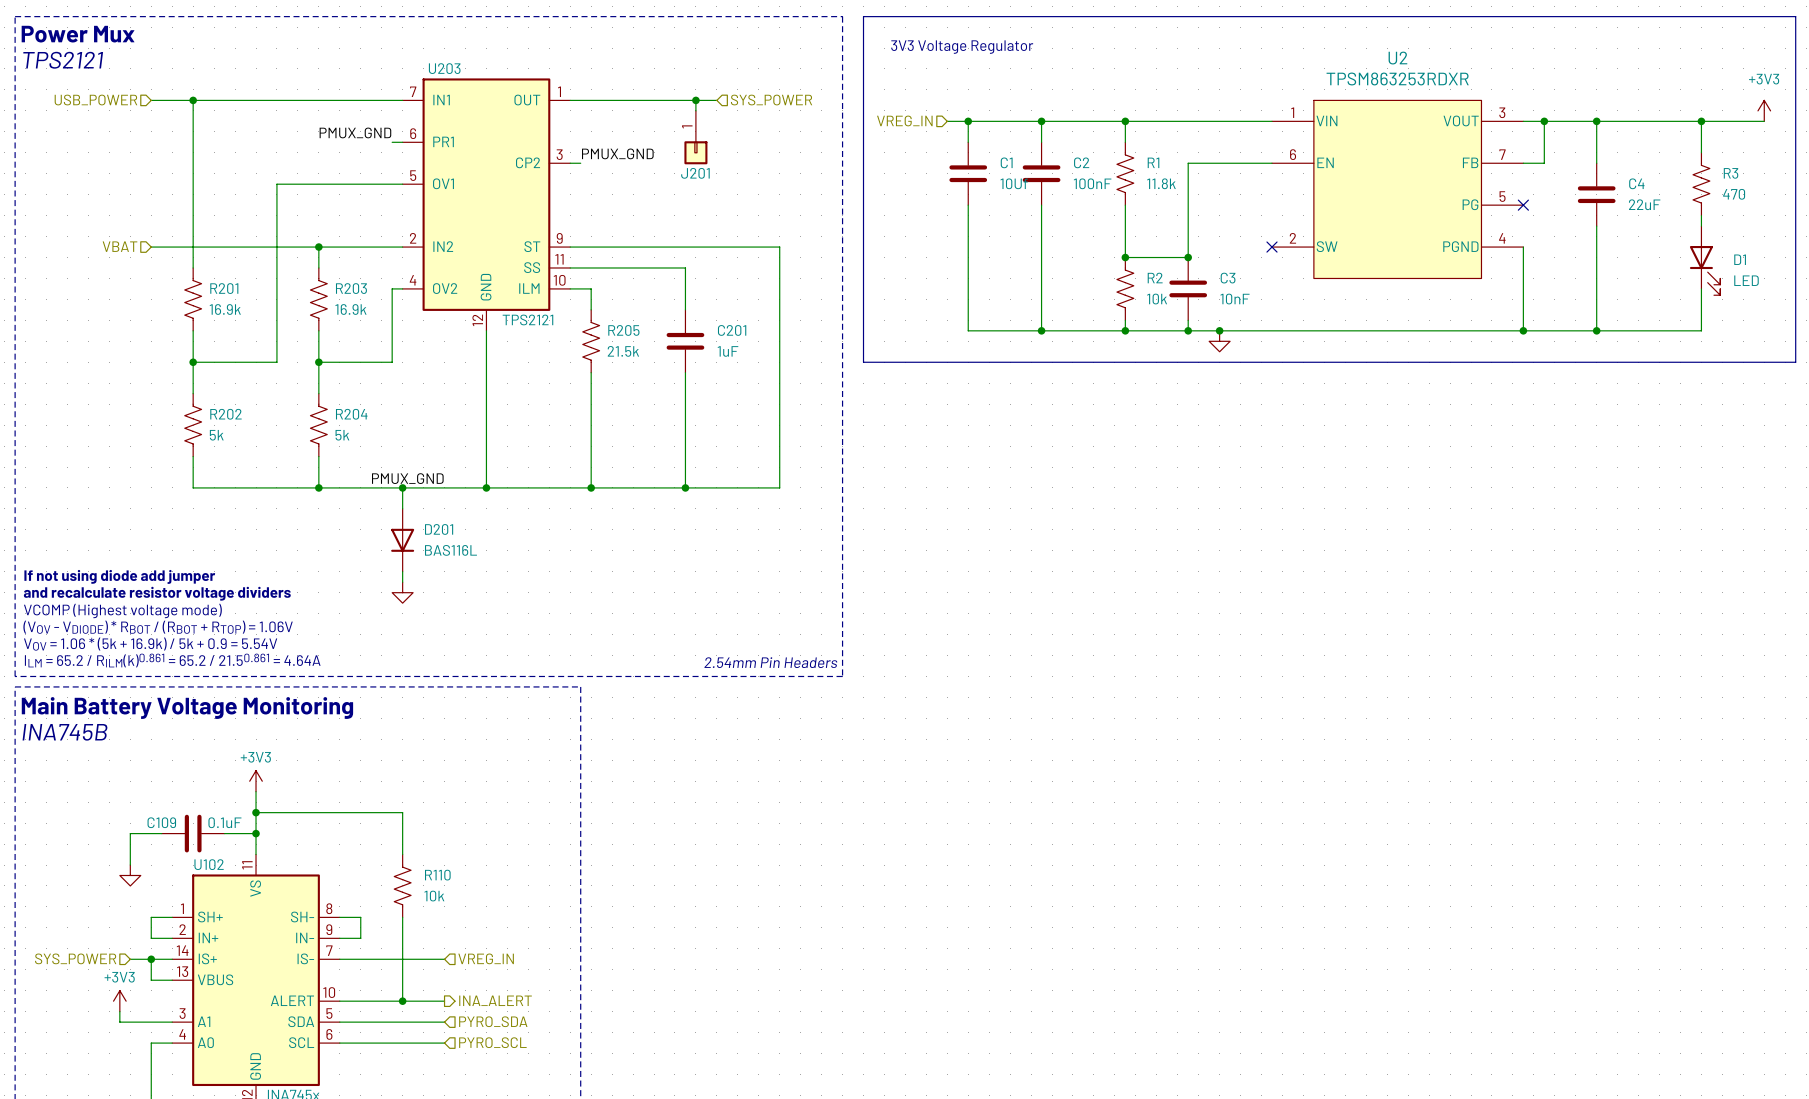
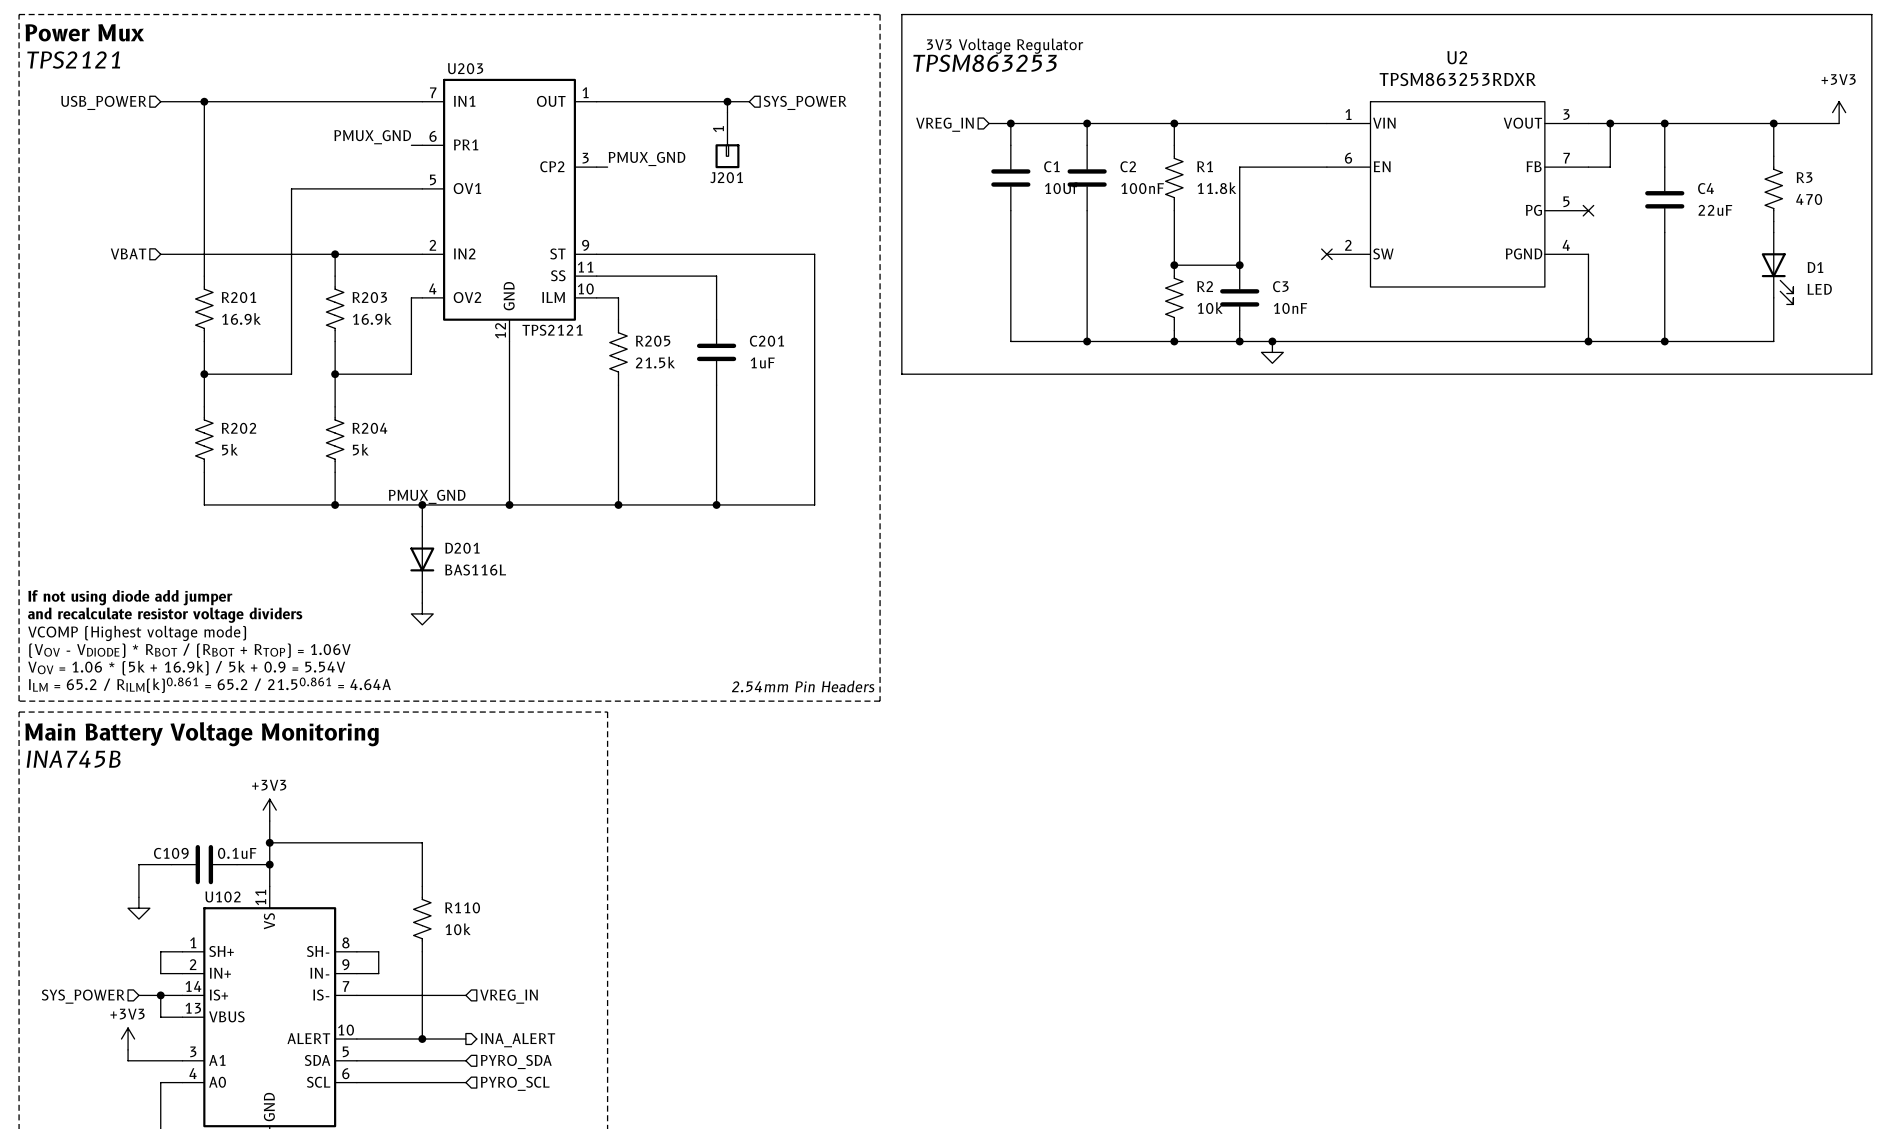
text: none -> TPSM863253 (985, 63)

